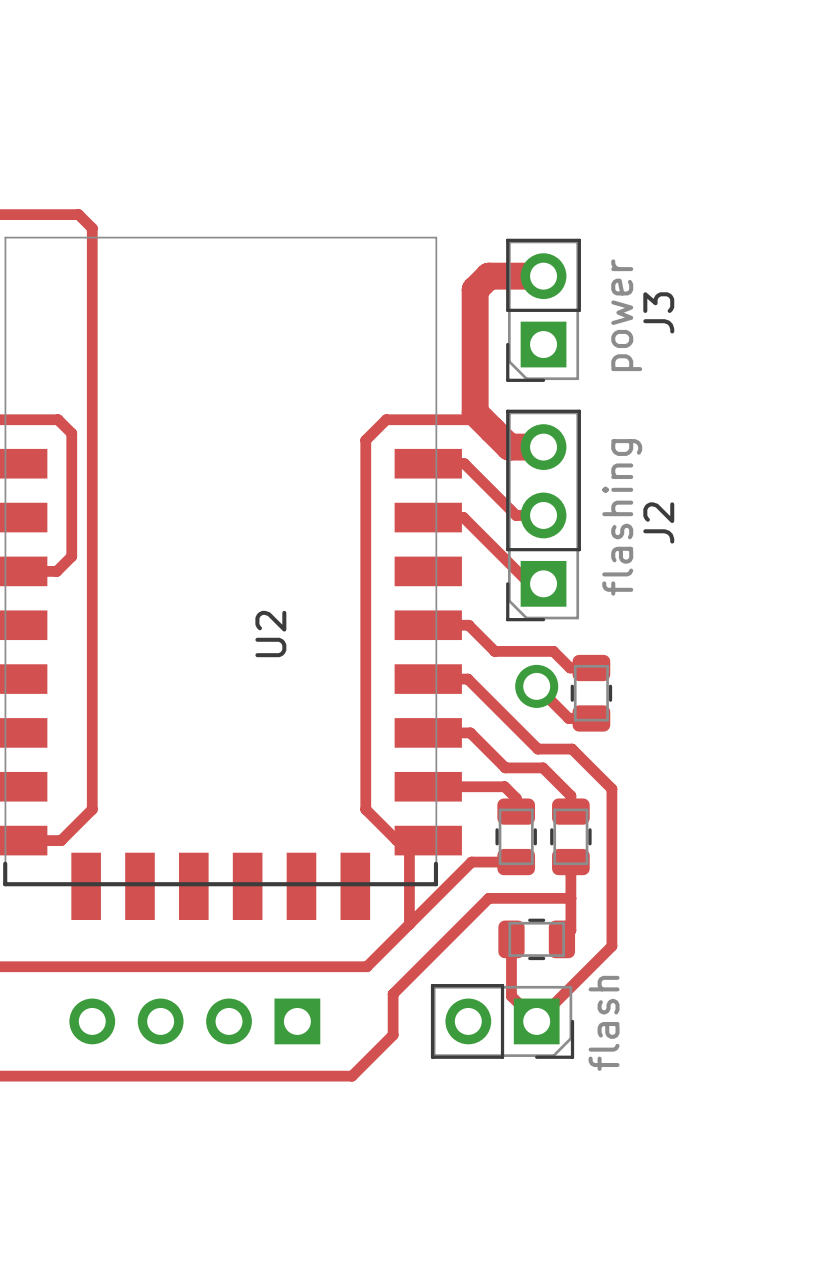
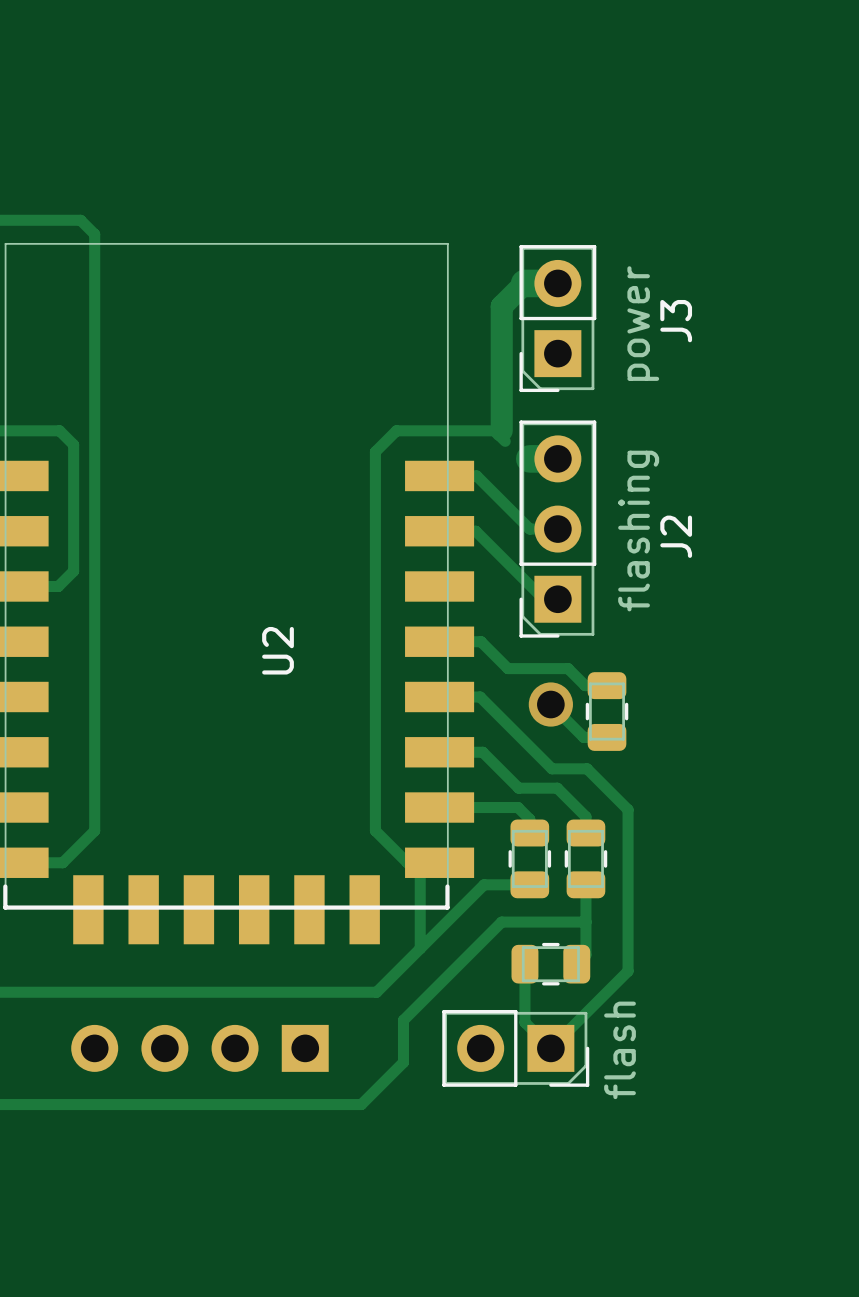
track: (511, 276) (488, 276) (475, 289) (475, 412) (509, 447) (516, 447) -> (524, 283) (501, 306) (501, 430)

